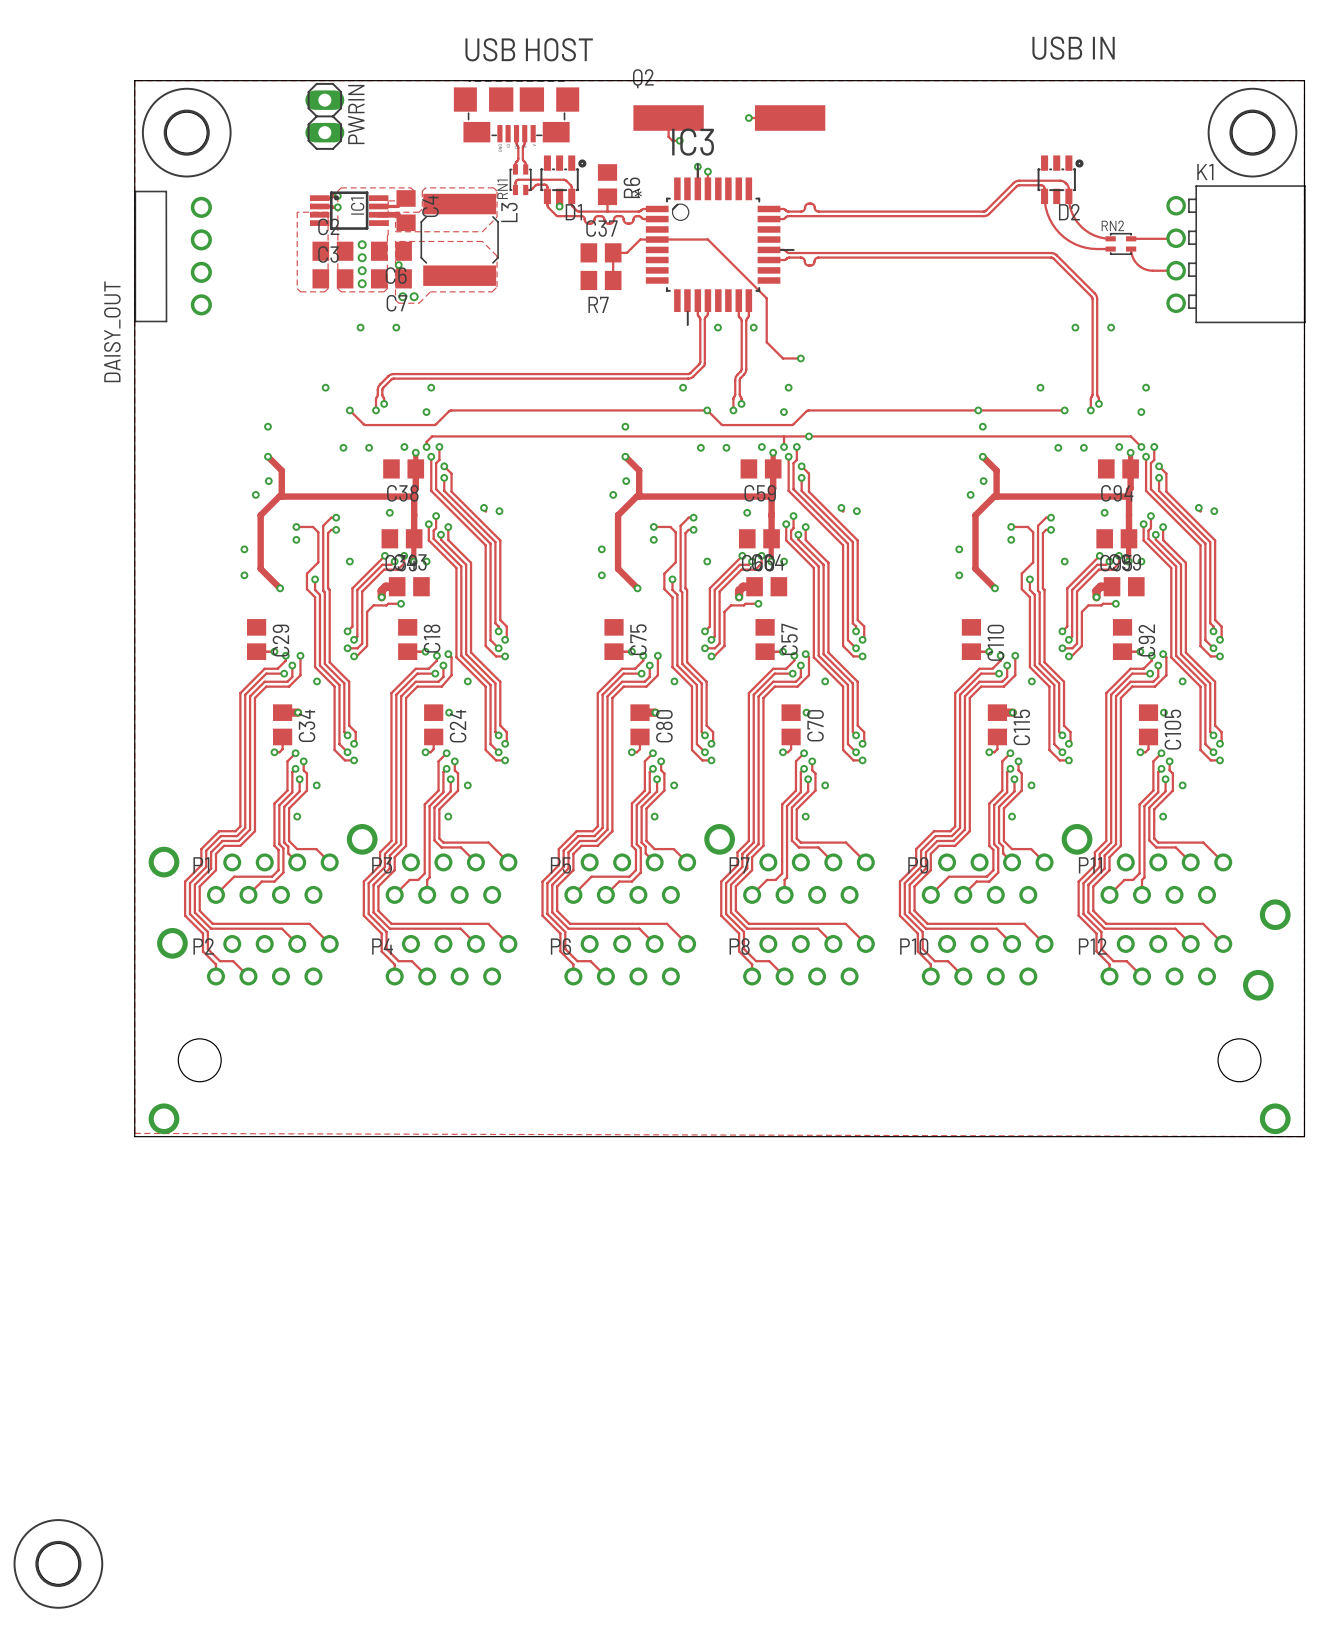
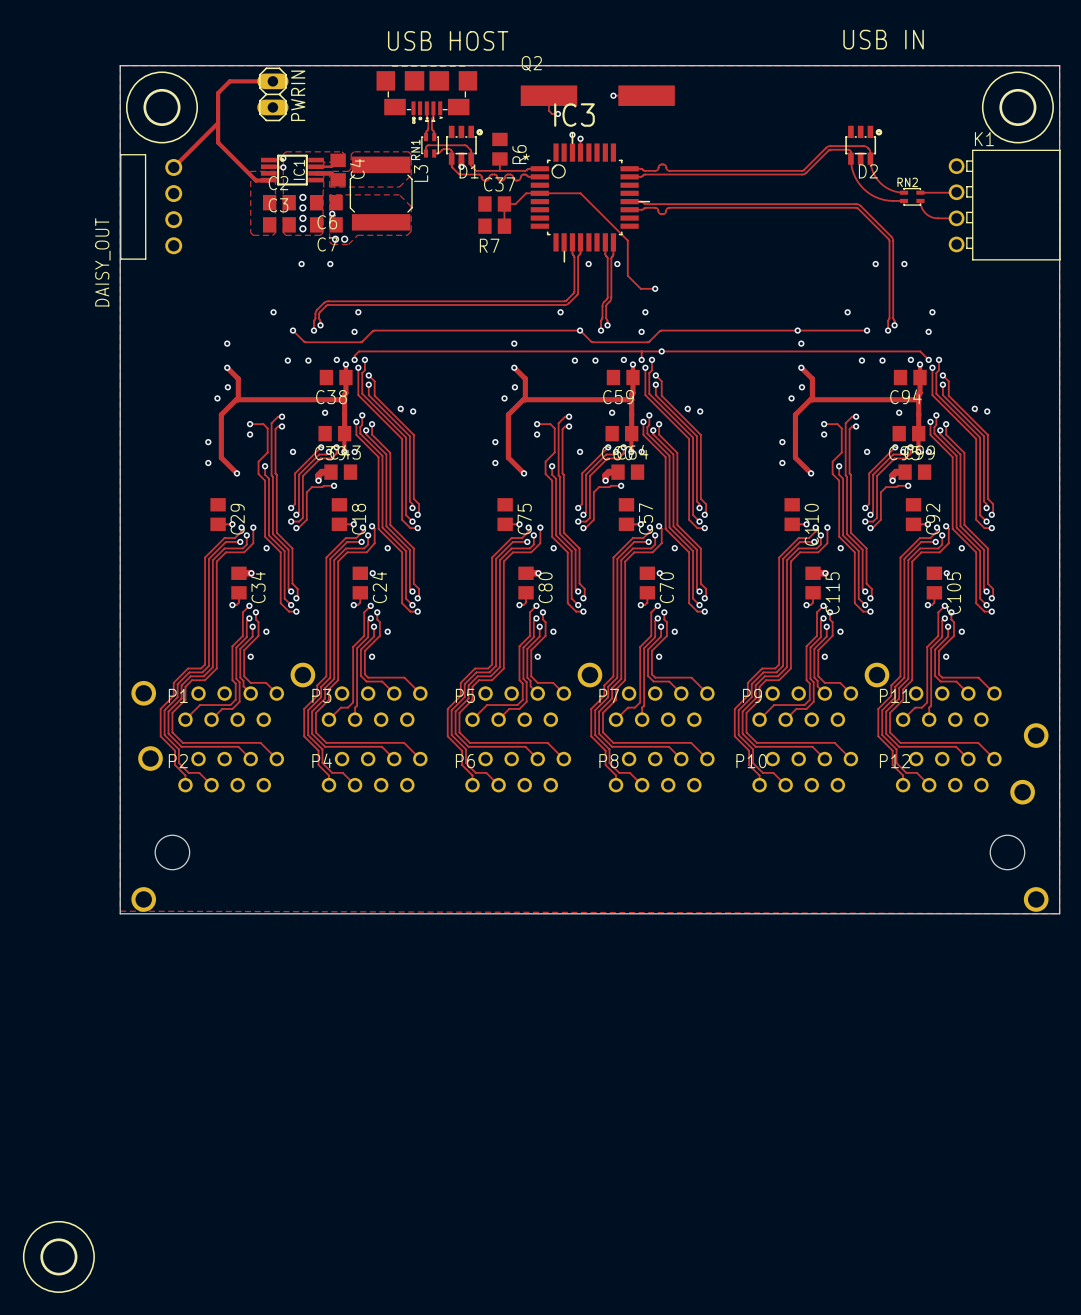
track: none -> (272, 81) (229, 81) (218, 93) (218, 142) (255, 180) (268, 180)
track: none -> (218, 123) (173, 167)

